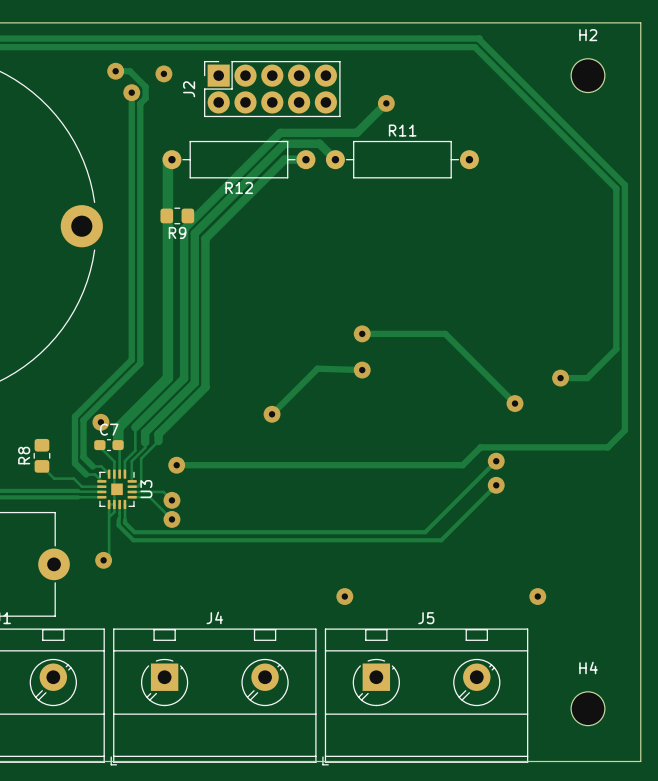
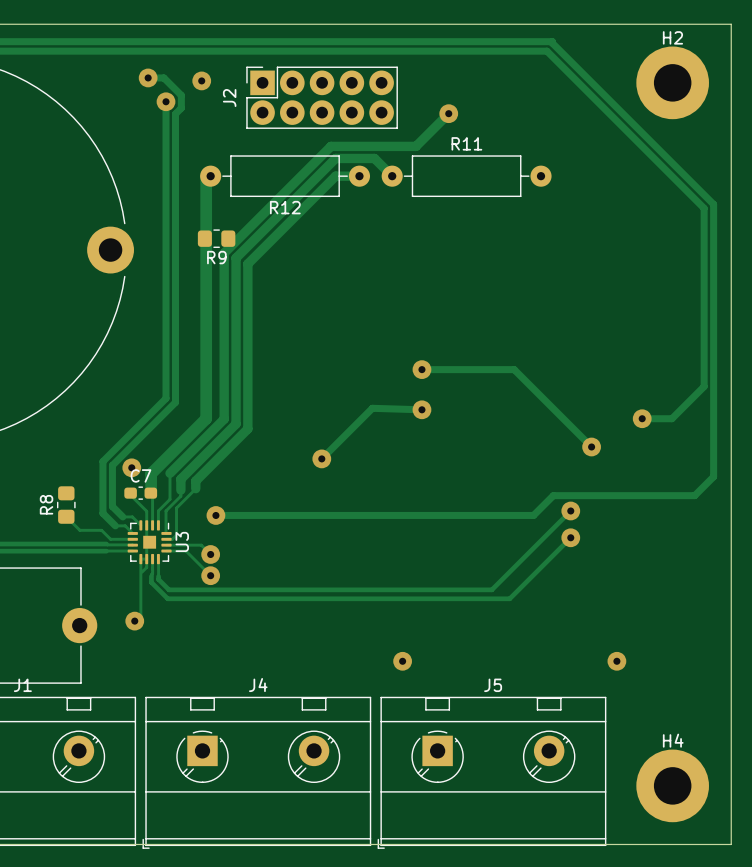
H2 footprint: [571, 58, 605, 93] -> [636, 46, 709, 120]
H4 footprint: [571, 691, 605, 726] -> [636, 749, 709, 823]

